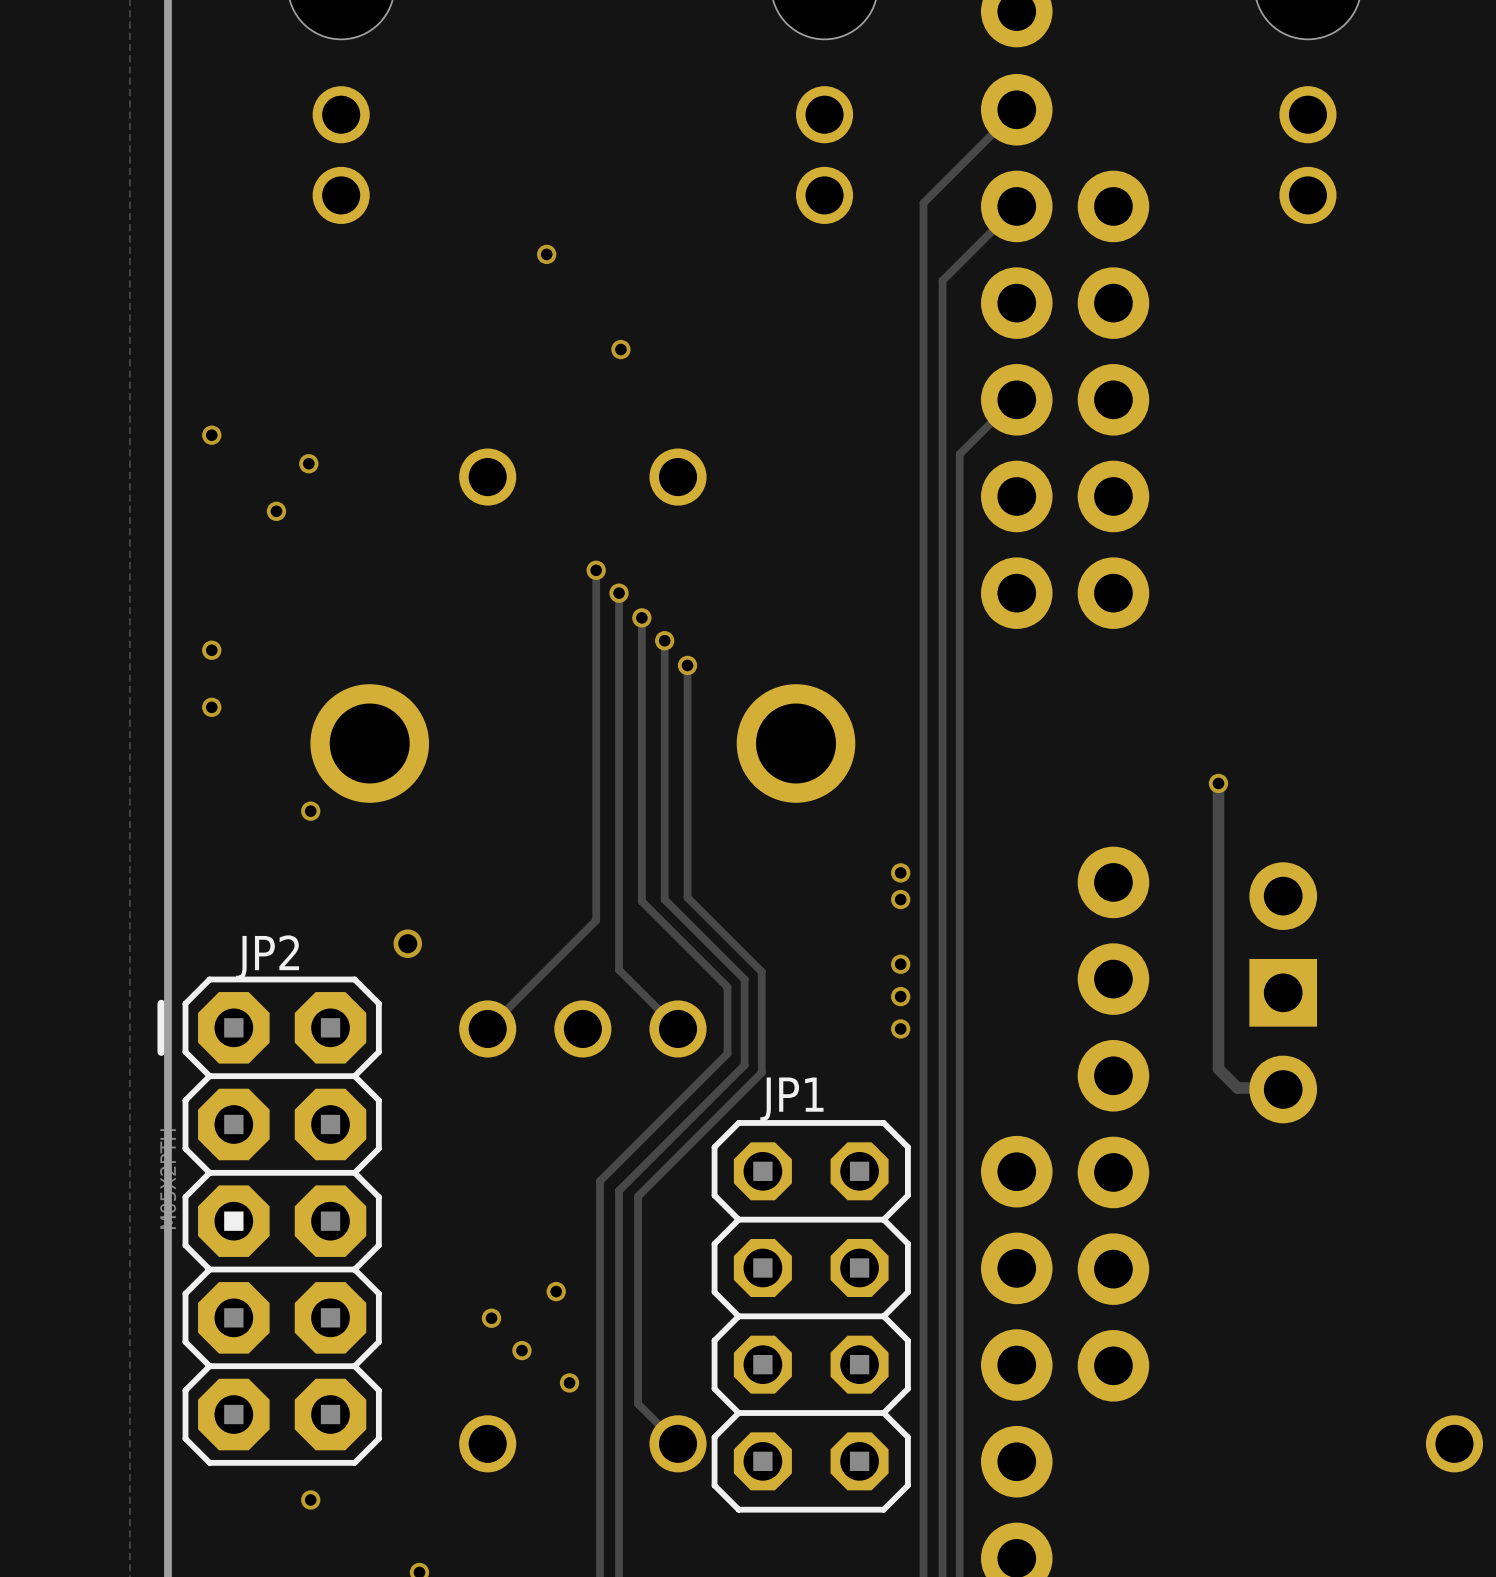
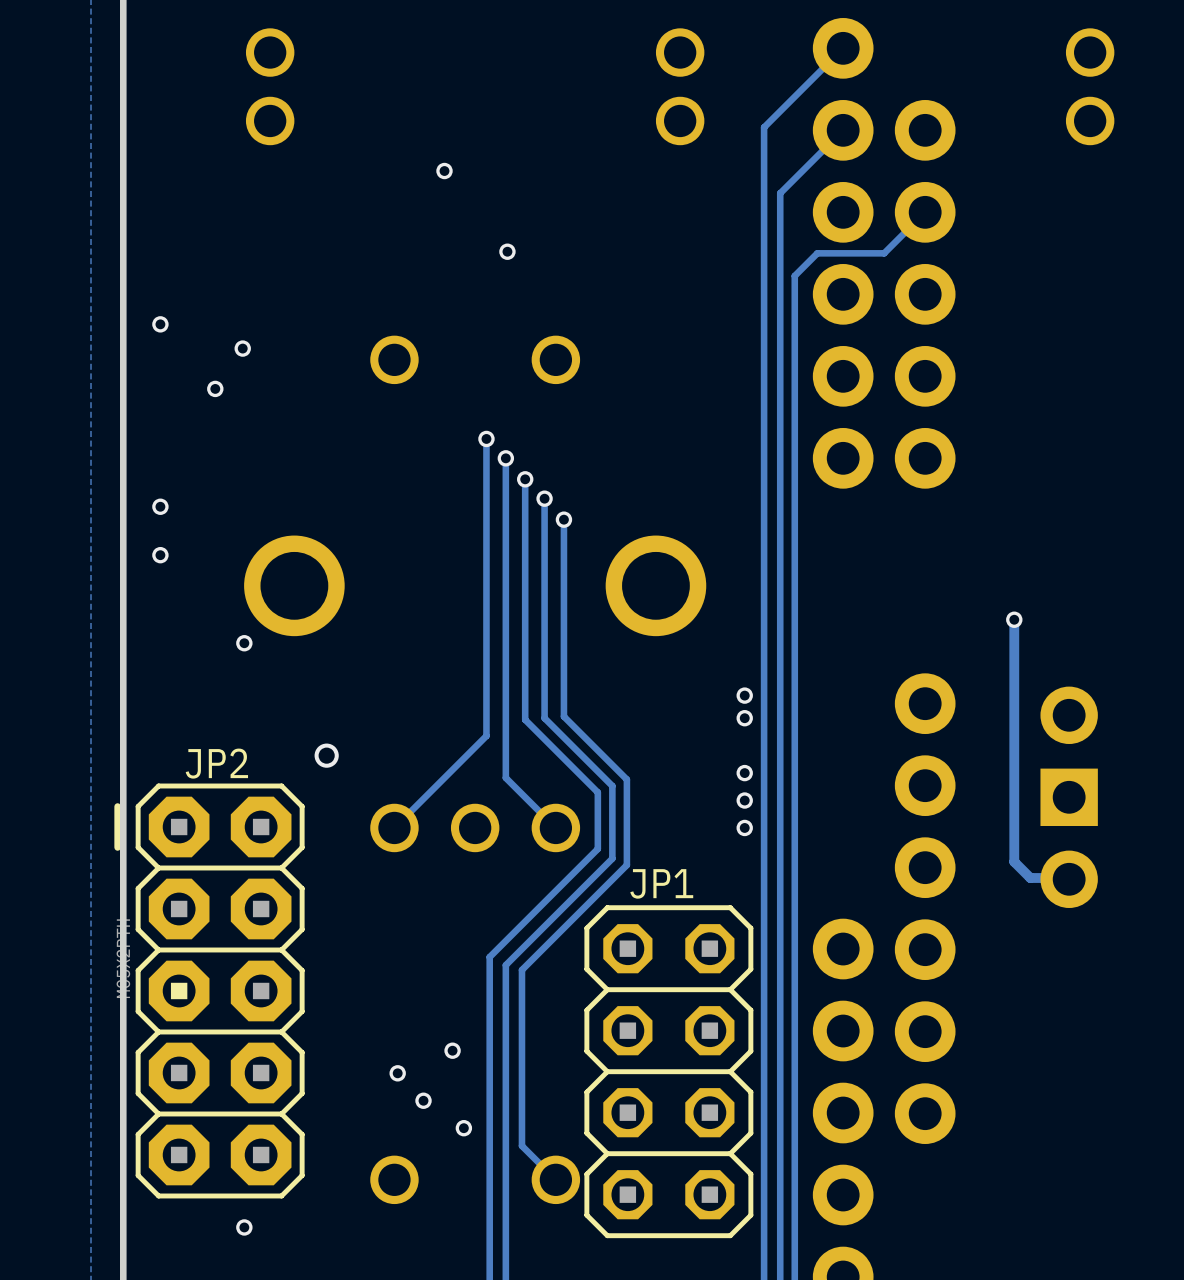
track: (1016, 397) (959, 454) -> (925, 212) (884, 253) (817, 253) (794, 275) (794, 340)

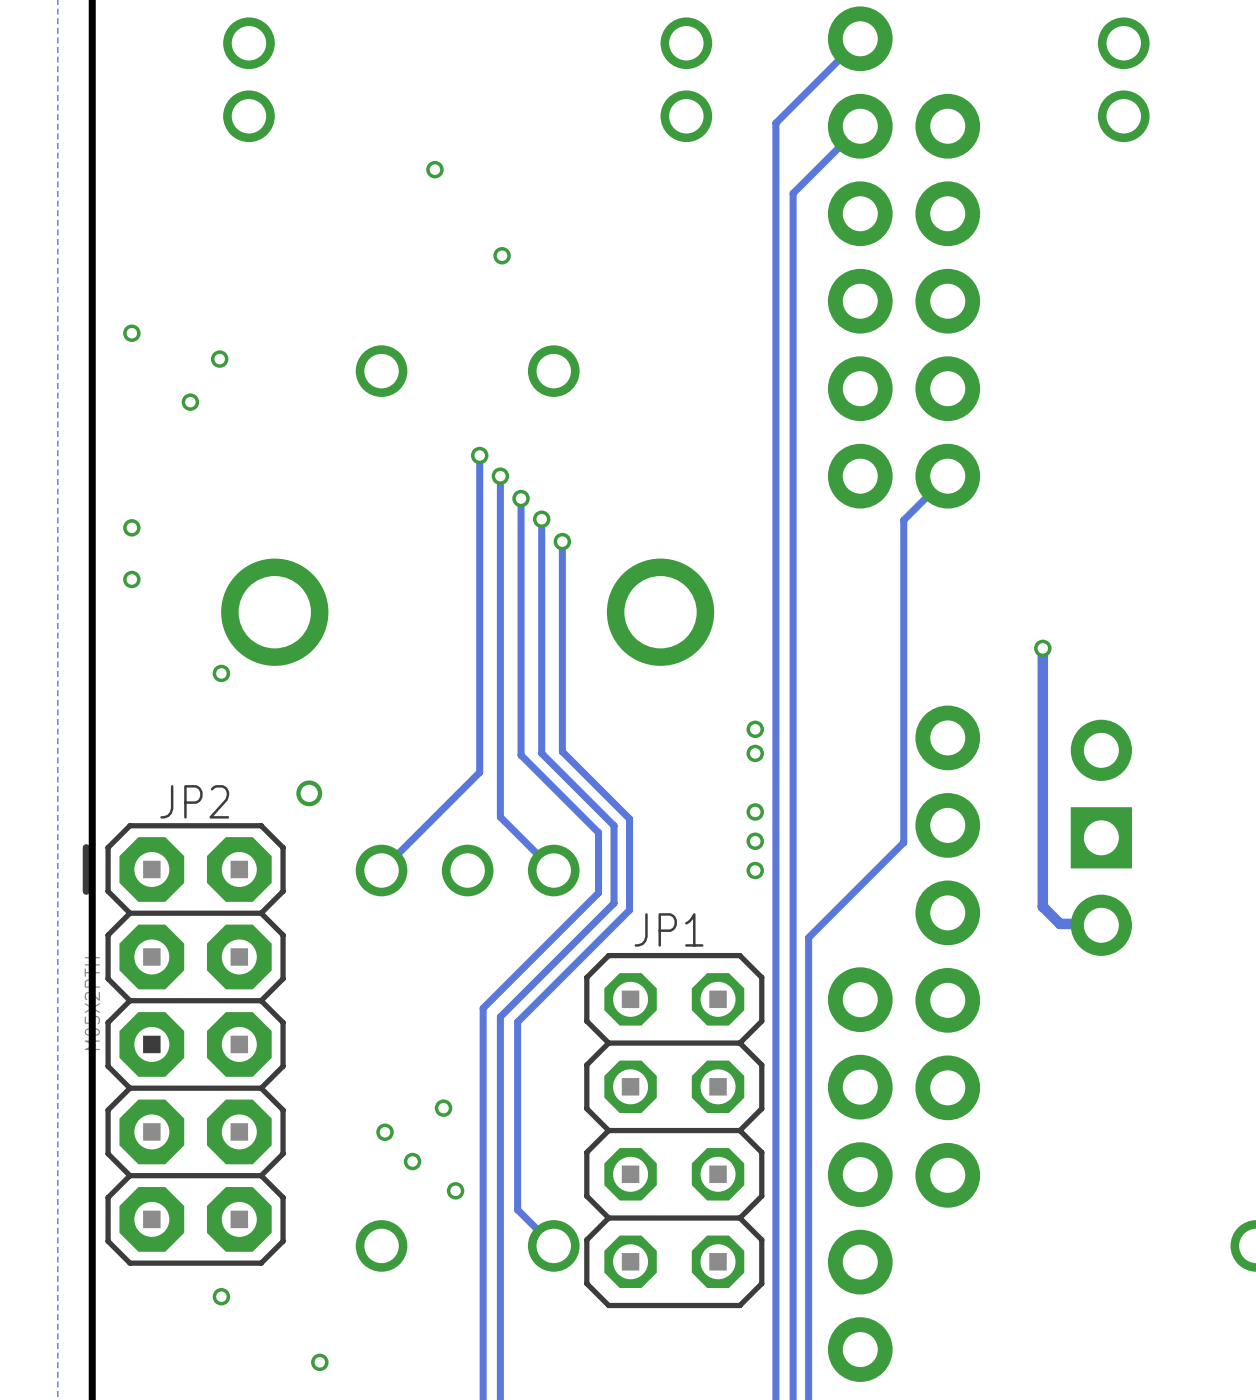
track: (925, 212) (884, 253) (817, 253) (794, 275) (794, 890) -> (947, 476) (903, 520) (903, 842) (808, 937)

